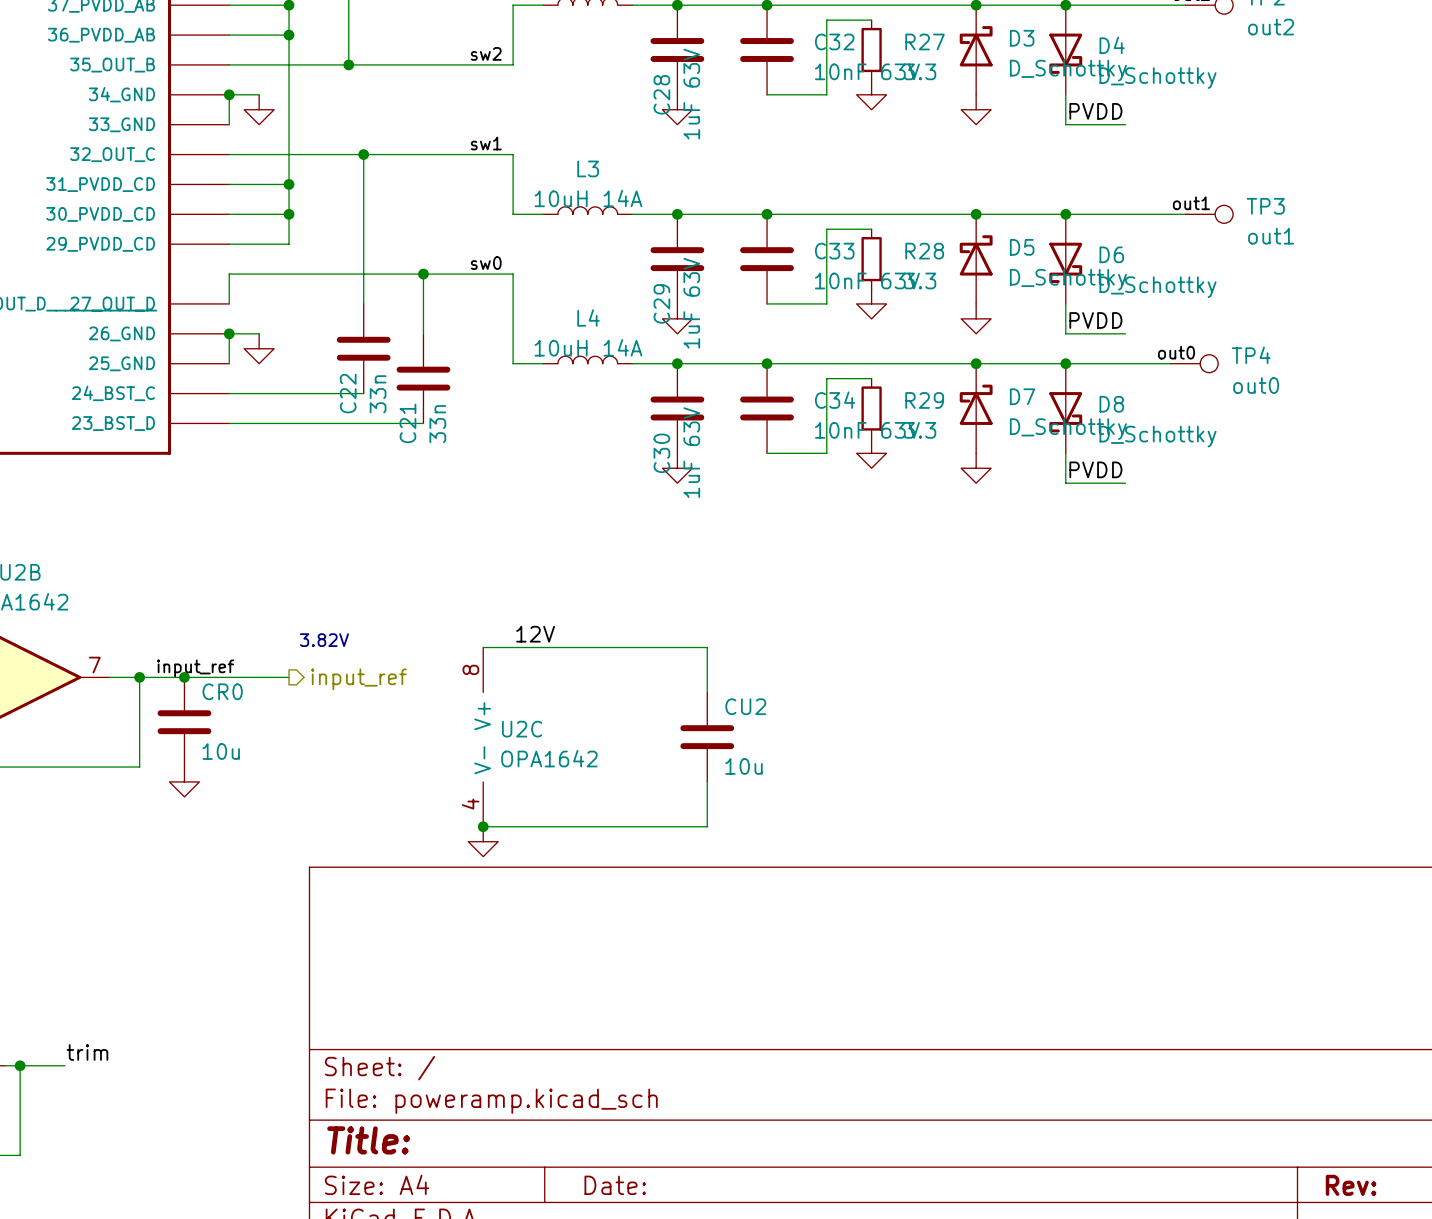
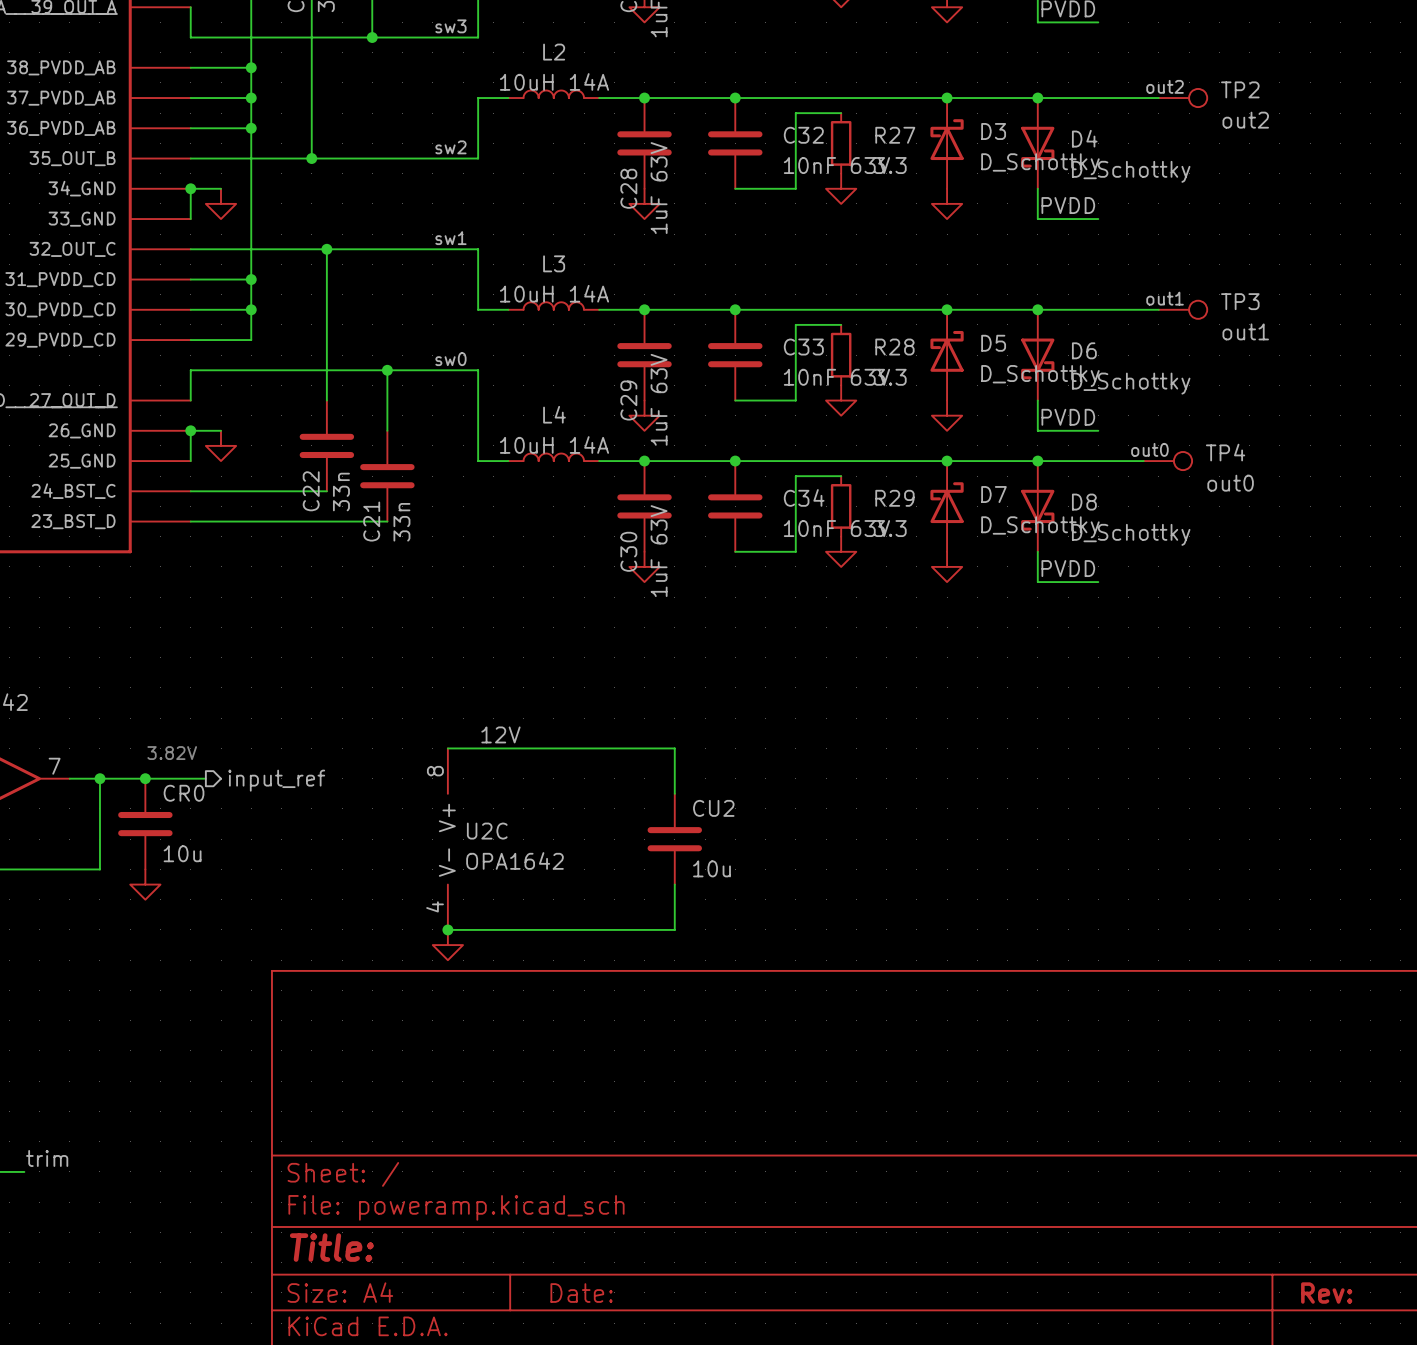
text position: 3.82V (324, 640) -> 3.82V (172, 753)
label: input_ref (195, 668) -> none
wire: (244, 677) (289, 677) -> none
hierarchical label position: input_ref (358, 679) -> input_ref (276, 780)

